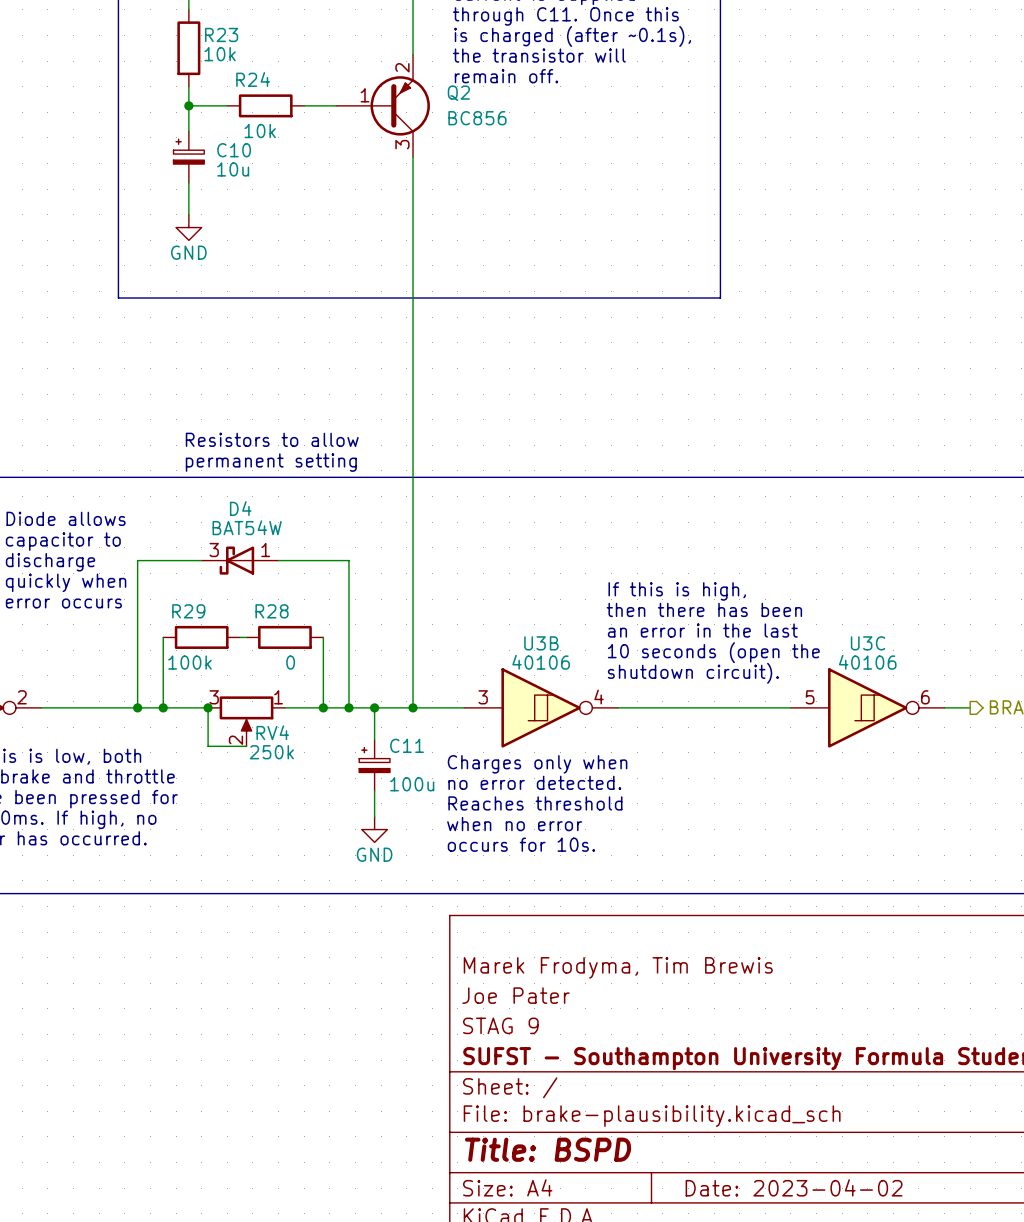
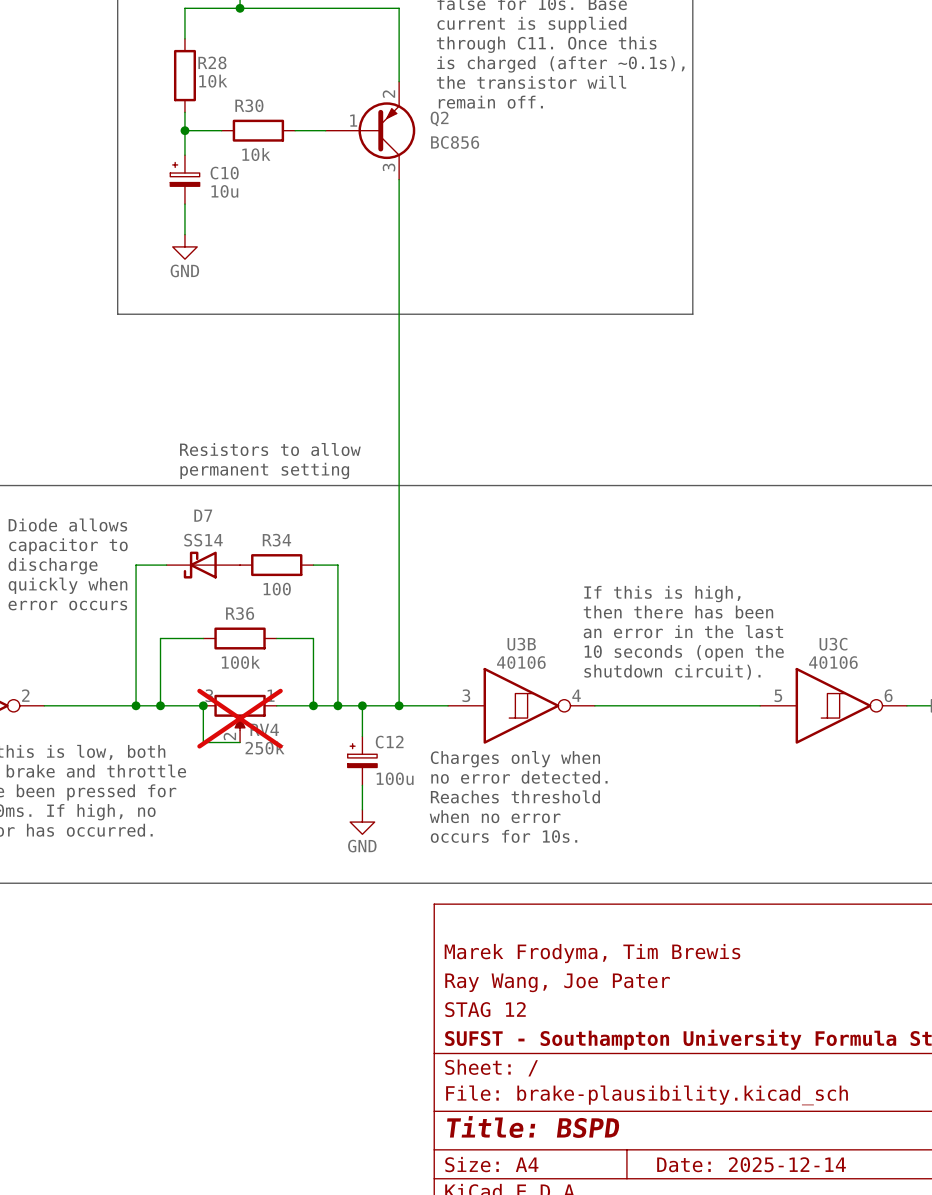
R23 name: R23 (221, 34) -> R28 (212, 62)
R24 name: R24 (253, 79) -> R30 (249, 105)
D7: none -> SS14 (203, 565)
D4: BAT54W (240, 560) -> none
wire: (278, 560) (323, 560) -> (160, 638) (203, 638)
R34: none -> 100 (276, 565)
R29: 100k (201, 637) -> none
wire: (240, 637) (246, 637) -> none
R36: none -> 100k (240, 638)
wire: none -> (276, 638) (313, 638)
R28: 0 (284, 637) -> none
RV4 do-not-place cross: none -> (240, 718)
C11 name: C11 (407, 745) -> C12 (389, 742)
title block: Joe Pater (515, 995) -> Ray Wang, Joe Pater (557, 982)
title block: STAG 9 (500, 1025) -> STAG 12 (485, 1009)
title block: Date: 2023-04-02 (794, 1187) -> Date: 2025-12-14 (751, 1164)

